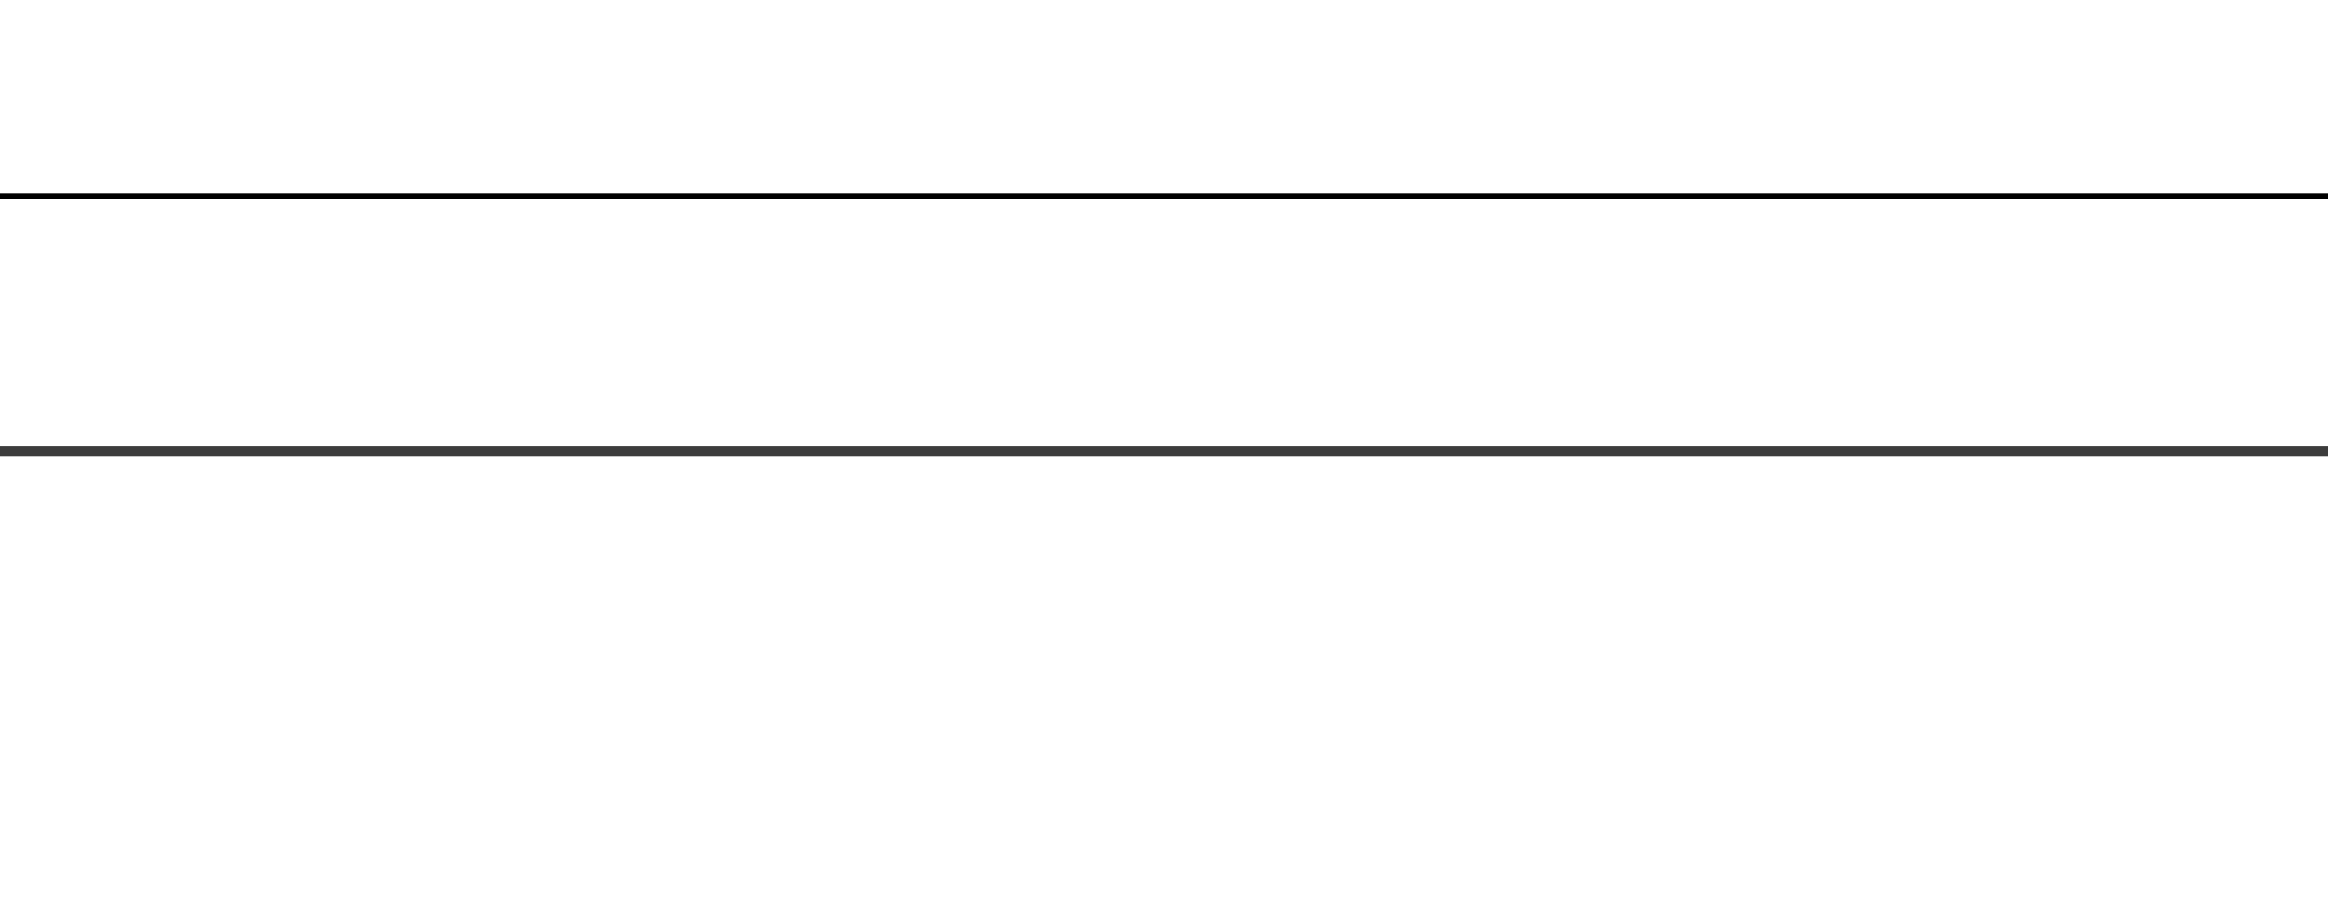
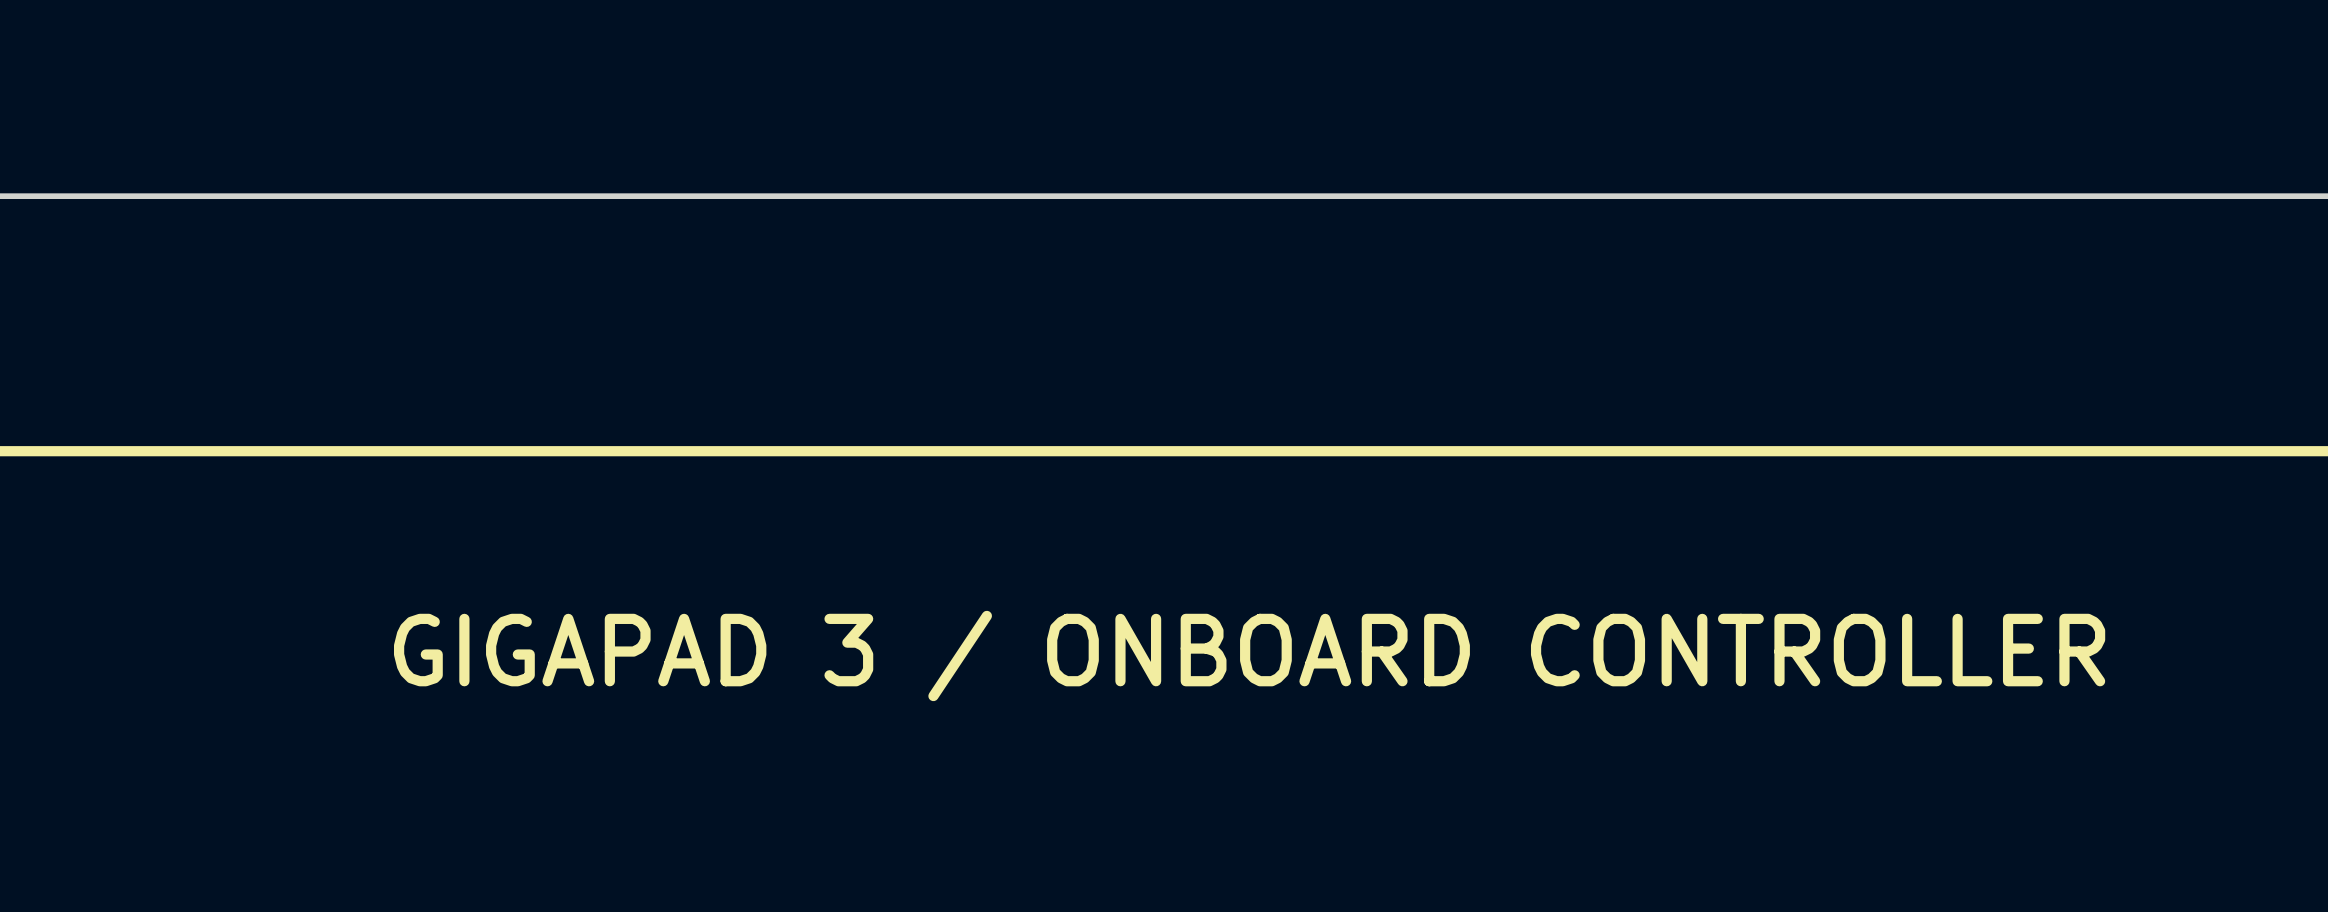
text: none -> GIGAPAD 3 / ONBOARD CONTROLLER (1249, 655)

